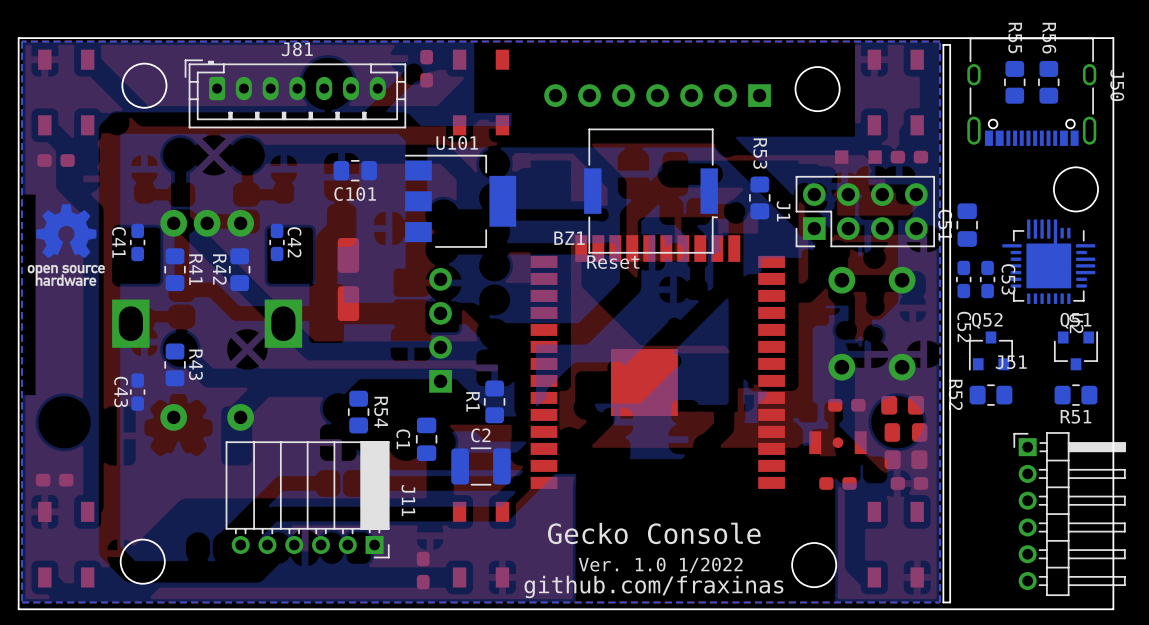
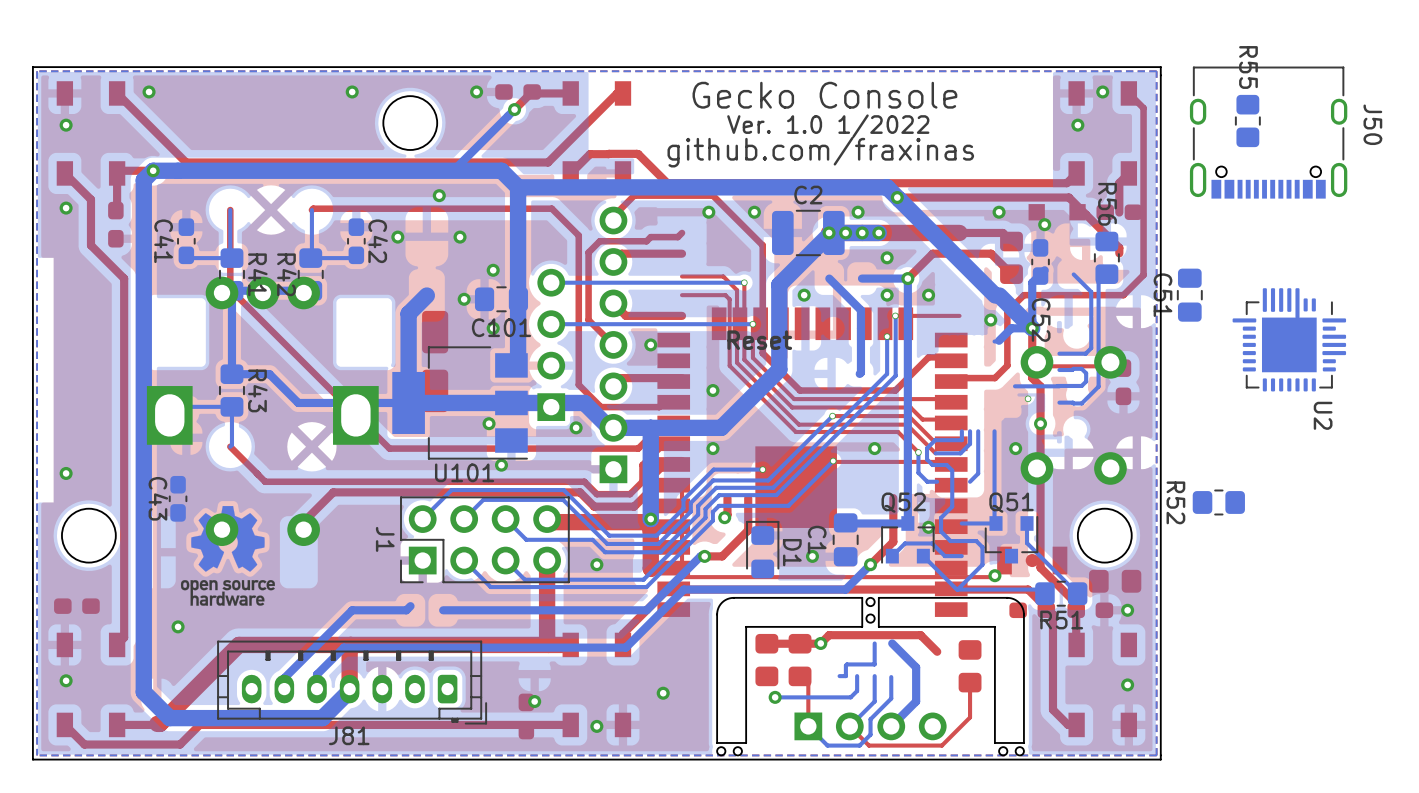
board edge: (943, 38) (1113, 38) (1113, 609) (18, 609) (18, 605) -> (1160, 755) (1160, 759) (32, 759)
board edge: (943, 44) (950, 44) (950, 602) (943, 602) -> (1160, 75) (1160, 67)
via: none -> (149, 91)
via: none -> (352, 91)
via: none -> (476, 91)
via: none -> (1102, 91)
top track: none -> (570, 93) (532, 91) (514, 109)
top track: none -> (622, 93) (617, 93) (548, 162) (186, 162) (117, 93)
top track: none -> (1128, 93) (1143, 108) (1143, 275) (1123, 295) (1023, 295) (1007, 311) (1007, 365) (994, 378) (959, 378)
text: none -> Gecko Console (824, 95)
round board edge: none -> [382, 95, 438, 151]
round board edge: [122, 63, 167, 109] -> none
round board edge: [795, 66, 841, 112] -> none
part rotation: 0° (426, 68) -> 90° clockwise (518, 91)
bottom track: none -> (514, 109) (453, 170)
via: none -> (514, 109)
R56 position: (1048, 82) -> (1106, 257)
via: none -> (66, 125)
text: none -> Ver. 1.0 1/2022 (828, 126)
via: none -> (1077, 125)
J81 rotation: 0° (295, 93) -> 180° (352, 682)
J81 position: (295, 93) -> (352, 682)
part rotation: 0° (657, 95) -> 90° clockwise (613, 344)
part position: (657, 95) -> (613, 344)
text: none -> github.com/fraxinas (820, 152)
top track: none -> (153, 170) (119, 170) (117, 173) (117, 204)
via: none -> (153, 170)
top track: none -> (64, 173) (90, 199) (90, 245) (124, 278) (124, 637) (117, 644)
top track: none -> (1076, 173) (1066, 183) (667, 183) (637, 153) (590, 154) (570, 173)
top track: none -> (1128, 173) (1119, 182) (1119, 212)
bottom track: none -> (518, 187) (501, 170) (153, 170) (143, 180) (143, 692) (169, 718) (322, 718) (349, 689)
bottom track: none -> (518, 187) (518, 365)
bottom track: none -> (518, 187) (887, 187) (995, 295)
via: none -> (439, 195)
top track: none -> (897, 197) (1068, 197) (1119, 247) (1119, 253)
via: none -> (897, 197)
via: none -> (66, 208)
top track: none -> (230, 210) (230, 289) (389, 448) (638, 448) (667, 419) (682, 419)
bottom track: none -> (230, 210) (230, 256) (231, 258) (189, 258) (186, 255)
top track: none -> (311, 210) (551, 208) (578, 235) (578, 384) (601, 407) (659, 407) (667, 398) (682, 398)
bottom track: none -> (311, 210) (310, 258) (353, 258) (356, 255)
via: none -> (708, 212)
via: none -> (754, 212)
via: none -> (858, 212)
via: none -> (999, 212)
part rotation: 0° (56, 160) -> 90° clockwise (115, 224)
part position: (56, 160) -> (115, 224)
top track: none -> (613, 216) (634, 195) (712, 195) (762, 245) (762, 353) (800, 390) (895, 390) (928, 357) (959, 357)
via: none -> (1044, 224)
round board edge: [1053, 167, 1099, 212] -> none
C101 position: (355, 170) -> (501, 299)
top track: none -> (682, 232) (677, 237) (650, 237) (646, 241) (599, 241) (588, 252) (588, 320) (613, 344)
top track: none -> (829, 232) (1002, 232) (1011, 241)
via: none -> (829, 232)
via: none -> (845, 232)
via: none -> (862, 232)
bottom track: none -> (878, 232) (845, 232)
via: none -> (878, 232)
bottom track: none -> (829, 235) (779, 284) (779, 369) (721, 427) (609, 427) (584, 402) (522, 402)
via: none -> (397, 237)
via: none -> (460, 237)
top track: none -> (682, 253) (621, 253) (613, 261)
BZ1: (651, 191) -> none
via: none -> (887, 257)
part: none -> (1011, 257)
R53: (759, 197) -> none
U101 rotation: 0° (460, 201) -> 180° (460, 402)
U101 position: (460, 201) -> (460, 402)
via: none -> (493, 270)
bottom track: none -> (1044, 270) (1032, 282) (1032, 328)
top track: none -> (1011, 274) (991, 253) (932, 253) (907, 278)
bottom track: none -> (1073, 274) (1091, 291) (1091, 348) (1085, 353) (1059, 353)
bottom track: none -> (1106, 274) (1098, 282) (1098, 386) (1081, 403) (1059, 402)
top track: none -> (682, 276) (723, 276) (737, 290) (737, 362) (798, 424) (906, 424) (935, 453)
bottom track: none -> (829, 278) (860, 310) (859, 373)
bottom track: none -> (861, 278) (907, 278) (907, 523) (845, 522)
via: none -> (907, 278)
J1 position: (865, 211) -> (484, 539)
top track: none -> (744, 282) (744, 359) (792, 407) (910, 407) (922, 419) (959, 419)
bottom track: none -> (744, 282) (551, 282)
via: none -> (744, 282)
bottom track: none -> (310, 290) (231, 290) (231, 374) (269, 374) (298, 402) (408, 402) (408, 313) (426, 295)
top track: none -> (682, 295) (725, 295) (729, 299) (729, 365) (795, 431) (898, 431) (918, 452)
via: none -> (804, 295)
via: none -> (887, 295)
via: none -> (928, 295)
bottom track: none -> (999, 295) (1032, 328)
via: none -> (464, 299)
top track: none -> (613, 303) (625, 315) (682, 315)
C41 position: (137, 242) -> (186, 241)
C42 position: (277, 242) -> (356, 241)
bottom track: none -> (895, 315) (895, 375) (776, 495) (719, 495) (705, 508) (705, 517) (643, 579) (524, 579) (505, 560)
via: none -> (895, 315)
top track: none -> (959, 315) (895, 315)
drawing position: (66, 245) -> (227, 555)
via: none -> (990, 320)
top track: none -> (752, 324) (752, 357) (794, 399) (959, 398)
bottom track: none -> (752, 324) (551, 324)
via: none -> (752, 324)
via: none -> (493, 328)
top track: none -> (1032, 328) (1032, 378) (1040, 386) (1040, 567) (1076, 603) (1076, 644)
bottom track: none -> (1032, 328) (1011, 328) (998, 341) (994, 341)
via: none -> (1032, 328)
bottom track: none -> (887, 336) (887, 373) (773, 487) (716, 487) (698, 505) (698, 514) (660, 552) (605, 552) (592, 539) (526, 539) (505, 519)
via: none -> (887, 336)
via: none -> (650, 344)
R41 position: (175, 269) -> (231, 274)
R42 position: (239, 269) -> (310, 274)
C52 position: (963, 279) -> (1040, 261)
C53 side: bottom (987, 279) -> top (1123, 382)
top track: none -> (1119, 366) (1046, 366) (1042, 369)
bottom track: none -> (1059, 369) (1081, 368) (1086, 373) (1086, 381) (1081, 385) (1057, 385)
top track: none -> (682, 378) (621, 378) (613, 386)
bottom track: none -> (1059, 386) (1015, 386)
via: none -> (712, 390)
bottom track: none -> (414, 398) (418, 402) (513, 402)
via: none -> (1028, 398)
bottom track: none -> (186, 409) (189, 406) (231, 406) (231, 445) (230, 446)
top track: none -> (832, 416) (908, 416) (932, 440) (959, 440)
bottom track: none -> (832, 416) (768, 480) (713, 480) (690, 502) (690, 511) (658, 543) (607, 543) (563, 499) (483, 499) (464, 519)
via: none -> (832, 416)
via: none -> (489, 423)
part position: (440, 330) -> (551, 344)
via: none -> (1040, 423)
via: none -> (576, 427)
bottom track: none -> (650, 427) (650, 519)
bottom track: none -> (961, 431) (961, 440) (935, 440) (927, 448) (927, 459) (932, 465) (946, 465) (952, 470) (952, 506) (941, 517) (941, 531) (950, 541) (976, 541) (982, 547) (982, 564) (957, 589) (1040, 589) (1044, 593)
bottom track: none -> (970, 431) (970, 443) (960, 453) (935, 453)
bottom track: none -> (978, 431) (978, 473) (970, 481)
bottom track: none -> (994, 431) (996, 523) (961, 523)
top track: none -> (682, 440) (667, 440) (642, 465) (642, 481) (630, 494) (596, 494) (584, 481) (265, 481) (258, 474)
top track: none -> (230, 446) (258, 474)
via: none -> (712, 448)
via: none -> (874, 448)
via: none -> (1015, 448)
Q52 position: (990, 350) -> (907, 539)
Q51 position: (1075, 350) -> (1011, 539)
bottom track: none -> (918, 452) (918, 472) (927, 481) (937, 481)
via: none -> (918, 452)
top track: none -> (682, 461) (667, 461) (653, 475) (653, 487) (634, 506) (594, 506) (580, 492) (333, 492) (298, 526)
bottom track: none -> (833, 461) (788, 505) (719, 505) (712, 511) (712, 520) (646, 587) (490, 587) (464, 560)
via: none -> (833, 461)
top track: none -> (959, 461) (833, 461)
R43 position: (175, 364) -> (231, 390)
via: none -> (501, 465)
bottom track: none -> (762, 469) (713, 469) (683, 499) (683, 508) (656, 535) (609, 535) (563, 490) (451, 490) (422, 519)
via: none -> (762, 469)
via: none -> (66, 473)
top track: none -> (682, 481) (682, 575) (683, 577) (994, 575)
top track: none -> (727, 498) (727, 514) (724, 517)
top track: none -> (748, 498) (748, 530) (722, 556) (704, 556)
top track: none -> (893, 498) (893, 541) (870, 564)
R51 position: (1075, 395) -> (1061, 593)
round board edge: none -> [1077, 508, 1133, 564]
R1: (494, 401) -> none
top track: none -> (547, 514) (554, 522) (647, 522) (650, 519) (651, 568)
part: (846, 405) -> none
part: (902, 405) -> none
via: none -> (724, 517)
via: none -> (650, 519)
R54: (358, 412) -> none
bottom track: none -> (1027, 523) (1027, 543) (1077, 593)
via: none -> (928, 527)
D1 side: top (905, 432) -> bottom (762, 549)
C1 position: (426, 439) -> (845, 539)
top track: none -> (547, 556) (548, 644)
bottom track: none -> (704, 556) (700, 556) (646, 610) (443, 610)
via: none -> (704, 556)
via: none -> (812, 556)
bottom track: none -> (923, 556) (956, 589)
bottom track: none -> (961, 556) (944, 556) (932, 543) (904, 543) (892, 556)
via: none -> (596, 564)
bottom track: none -> (870, 564) (845, 589) (683, 589) (625, 647) (343, 647) (316, 674) (316, 689)
via: none -> (870, 564)
via: none -> (994, 575)
C2 position: (481, 466) -> (808, 232)
round board edge: none -> [865, 597, 876, 607]
board edge: none -> (862, 597) (733, 597) (721, 602) (717, 614) (717, 742) (746, 742) (746, 626) (862, 626) (862, 597)
board edge: none -> (1007, 597) (878, 597) (878, 626) (994, 626) (994, 742) (1023, 742) (1023, 612) (1017, 601) (1007, 597)
bottom track: none -> (410, 606) (406, 610) (352, 610) (284, 678) (284, 689)
part position: (909, 483) -> (1090, 610)
via: none -> (1127, 610)
round board edge: none -> [865, 614, 876, 624]
via: none -> (178, 626)
J11: (307, 499) -> none
top track: none -> (766, 643) (820, 643) (829, 635) (920, 635) (937, 651)
via: none -> (820, 643)
bottom track: none -> (874, 643) (874, 664) (846, 664) (845, 676) (839, 676)
bottom track: none -> (892, 643) (916, 667) (916, 701) (891, 726)
top track: none -> (350, 644) (349, 689)
top track: none -> (570, 644) (238, 644) (159, 723) (117, 724)
top track: none -> (622, 644) (622, 633) (667, 589) (1028, 589) (1052, 614) (1052, 709) (1068, 724) (1076, 724)
J51: (1069, 514) -> none
part: none -> (766, 660)
part: none -> (800, 660)
part: none -> (970, 666)
text: Gecko Console (654, 533) -> none
top track: none -> (800, 676) (808, 684) (808, 726)
bottom track: none -> (857, 676) (857, 690) (850, 697) (775, 697)
bottom track: none -> (874, 676) (874, 701) (849, 726)
bottom track: none -> (891, 677) (891, 698) (870, 719) (870, 734) (859, 745) (827, 745) (808, 726)
via: none -> (66, 680)
round board edge: [791, 542, 837, 588] -> none
top track: none -> (970, 684) (970, 717) (941, 745) (868, 745) (849, 726)
via: none -> (1127, 684)
via: none -> (663, 693)
via: none -> (775, 697)
via: none -> (534, 701)
round board edge position: (142, 561) -> (88, 535)
text: Ver. 1.0 1/2022 (660, 565) -> none
top track: none -> (570, 724) (199, 724) (180, 744) (84, 744) (64, 724)
via: none -> (596, 726)
part: none -> (870, 726)
text: github.com/fraxinas (653, 586) -> none
round board edge: none -> [716, 746, 726, 756]
round board edge: none -> [733, 746, 743, 756]
round board edge: none -> [998, 746, 1008, 756]
round board edge: none -> [1015, 746, 1025, 756]

